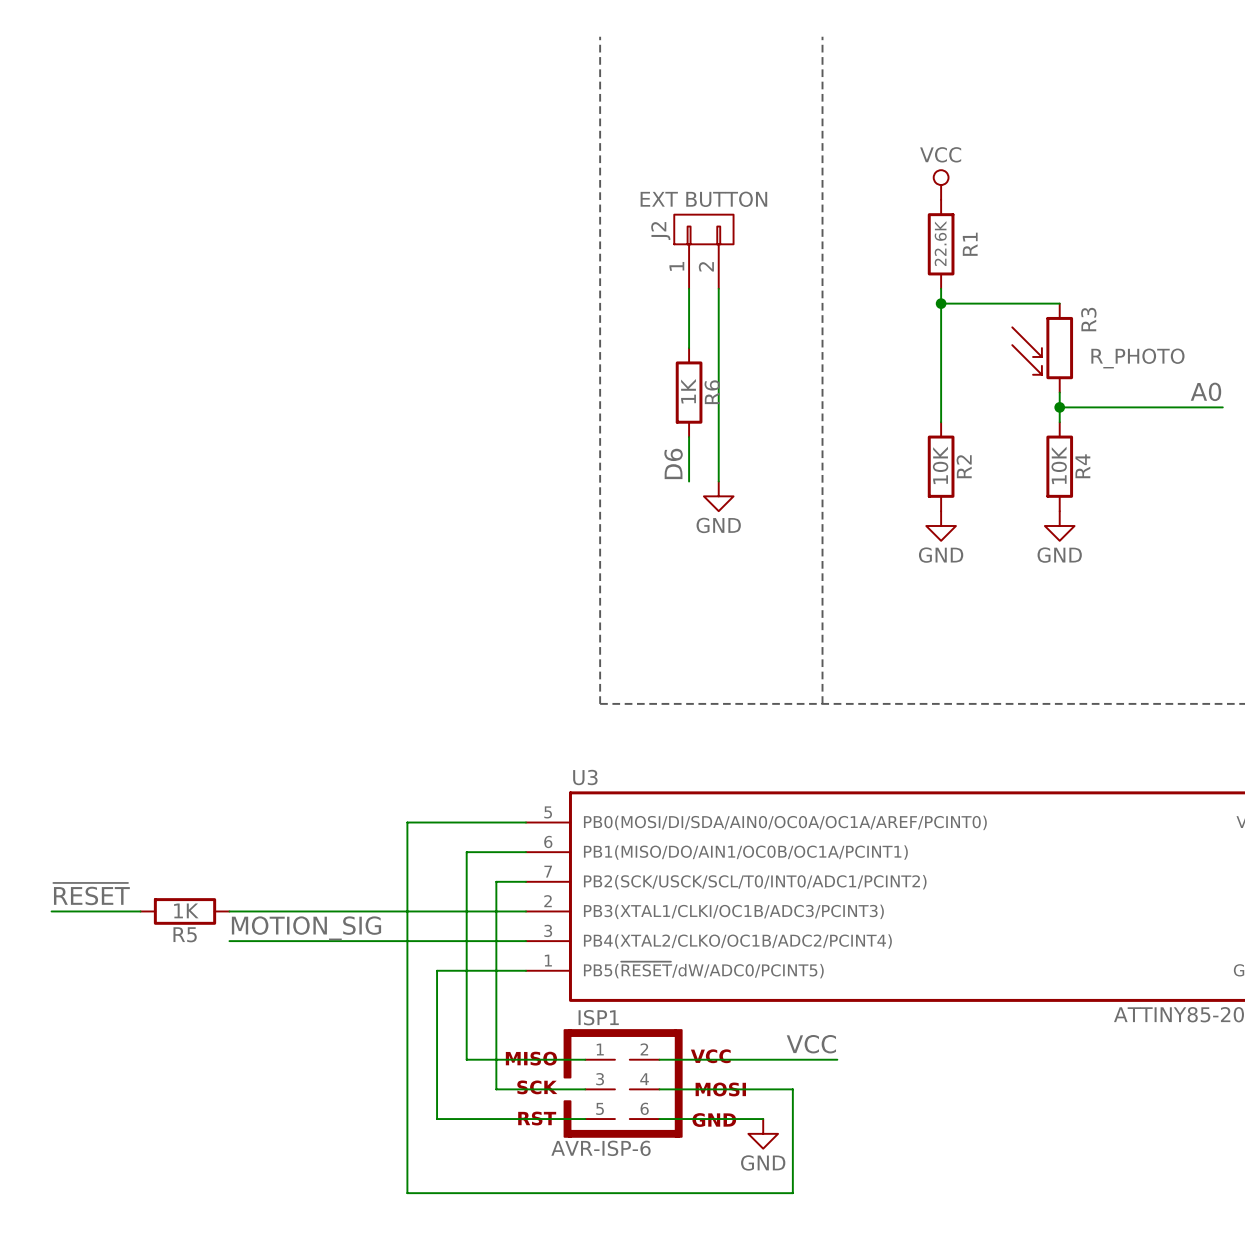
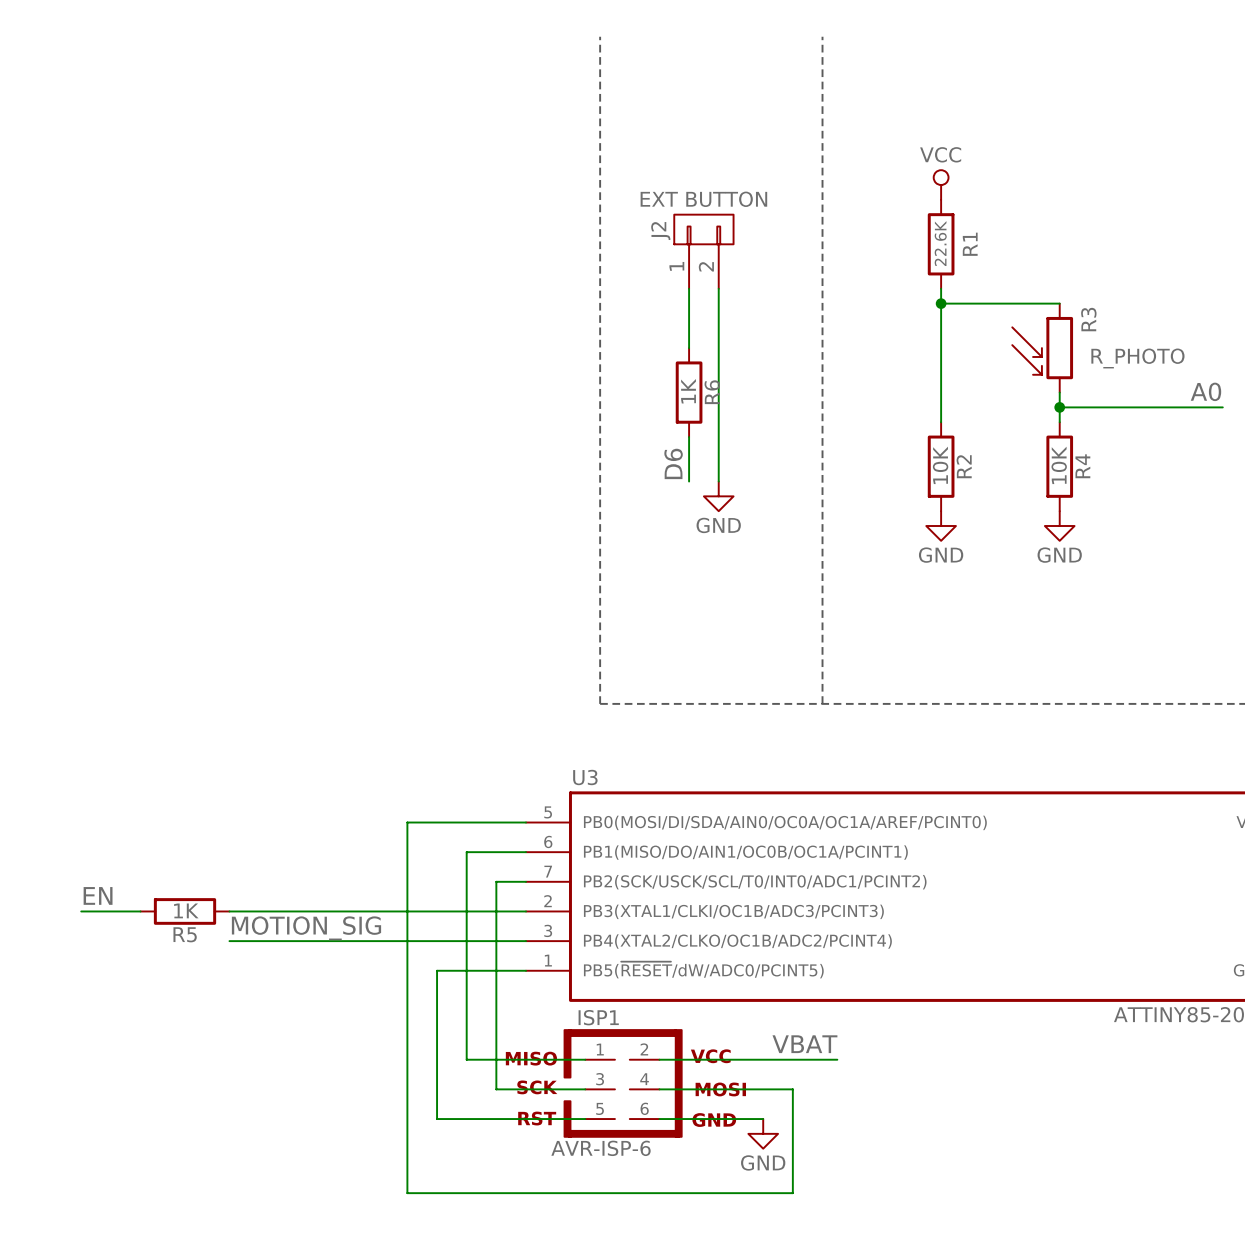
label: ~{RESET} (91, 894) -> none
label: none -> EN (98, 895)
wire: (51, 911) (81, 911) -> none
label: VCC (811, 1044) -> VBAT (804, 1044)

